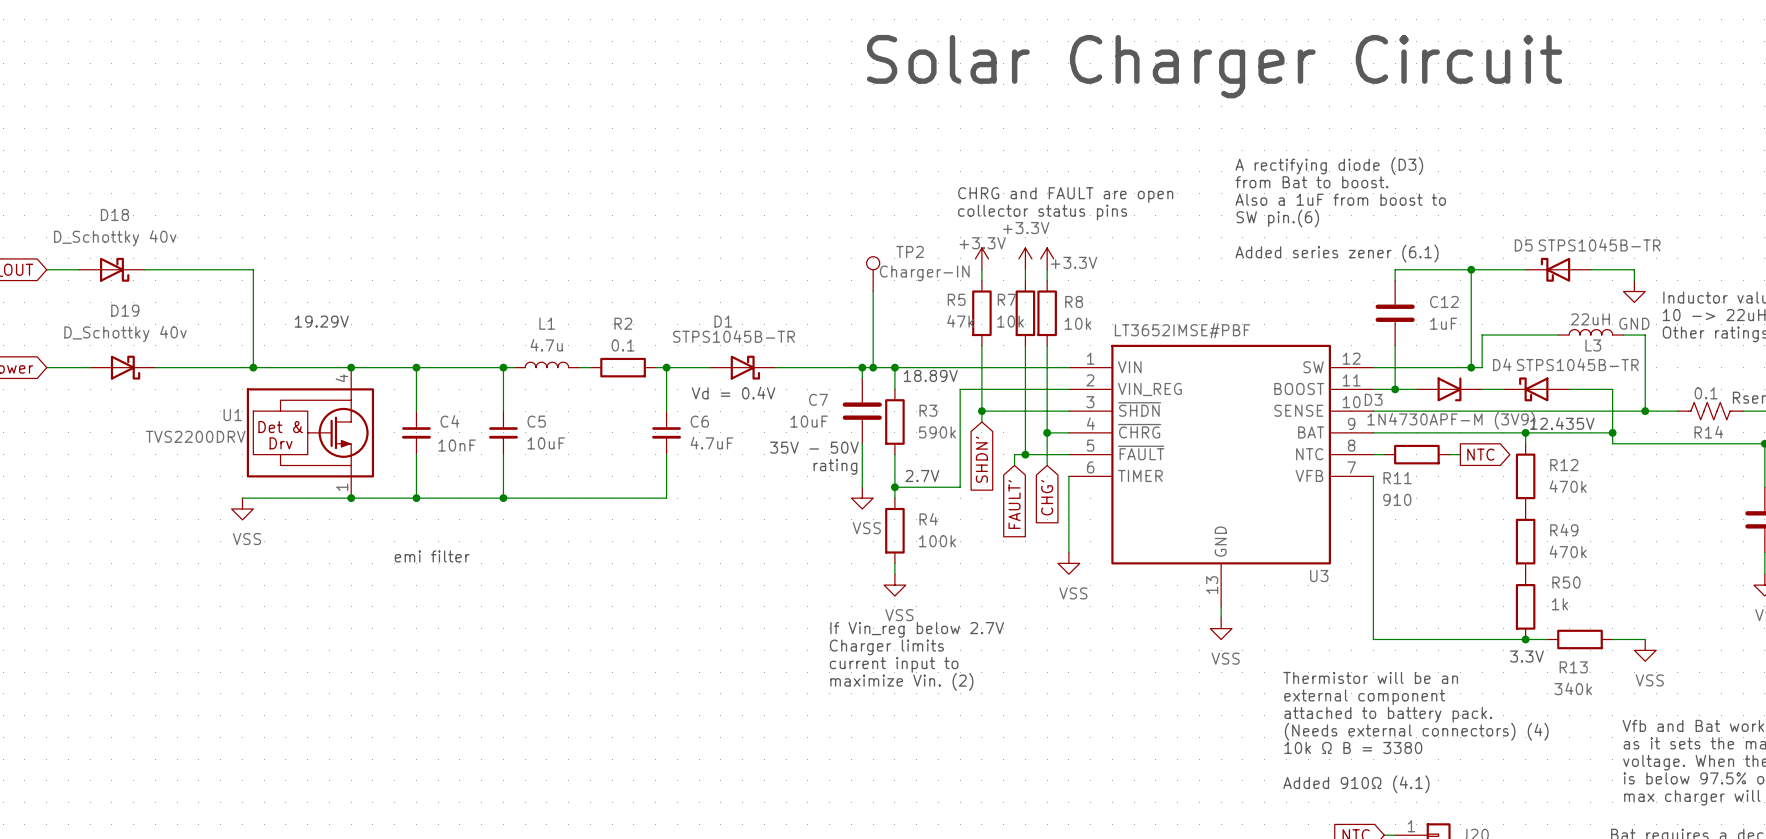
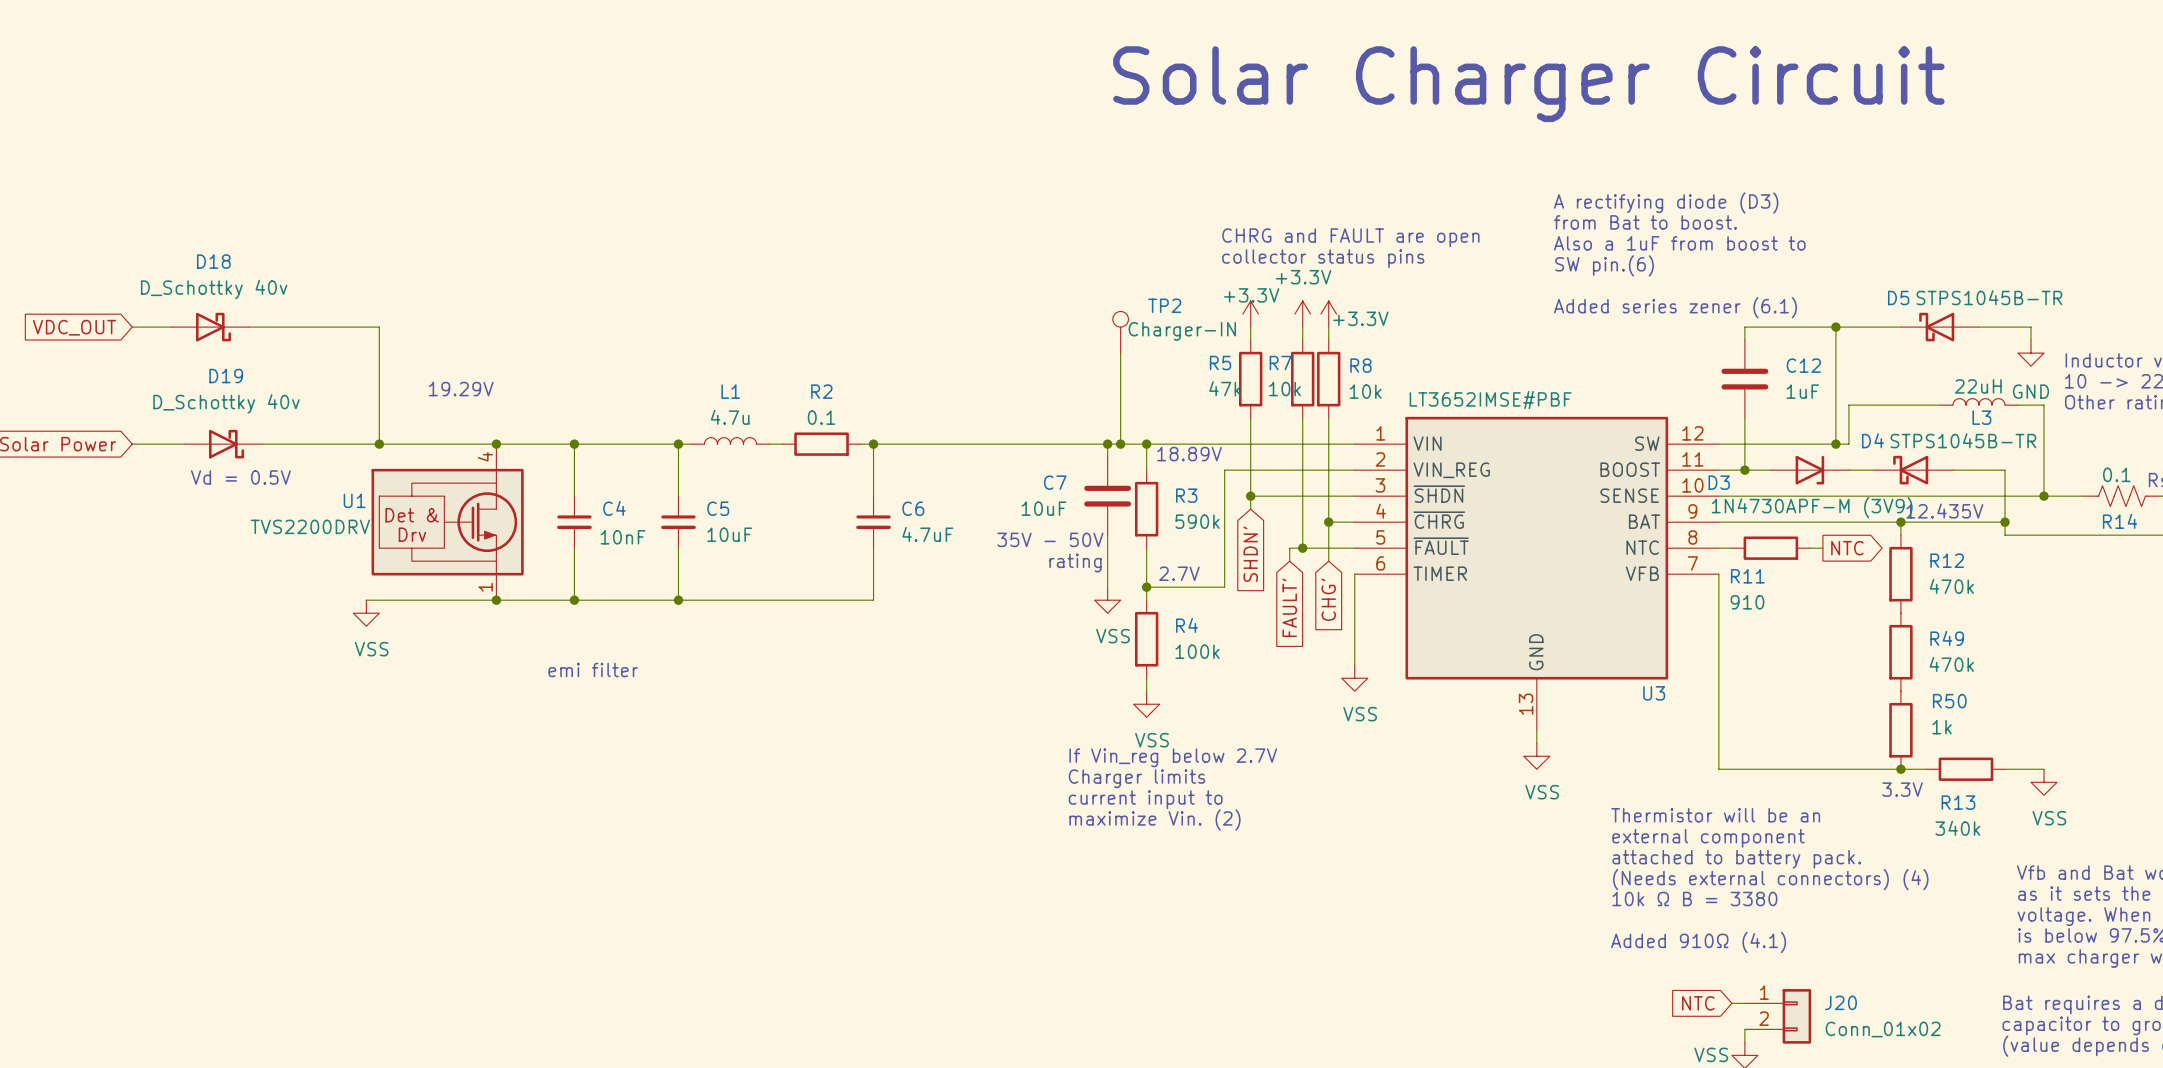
D1: STPS1045B-TR (742, 367) -> none
text: Vd = 0.4V (733, 393) -> none
text: none -> Vd = 0.5V (240, 477)

